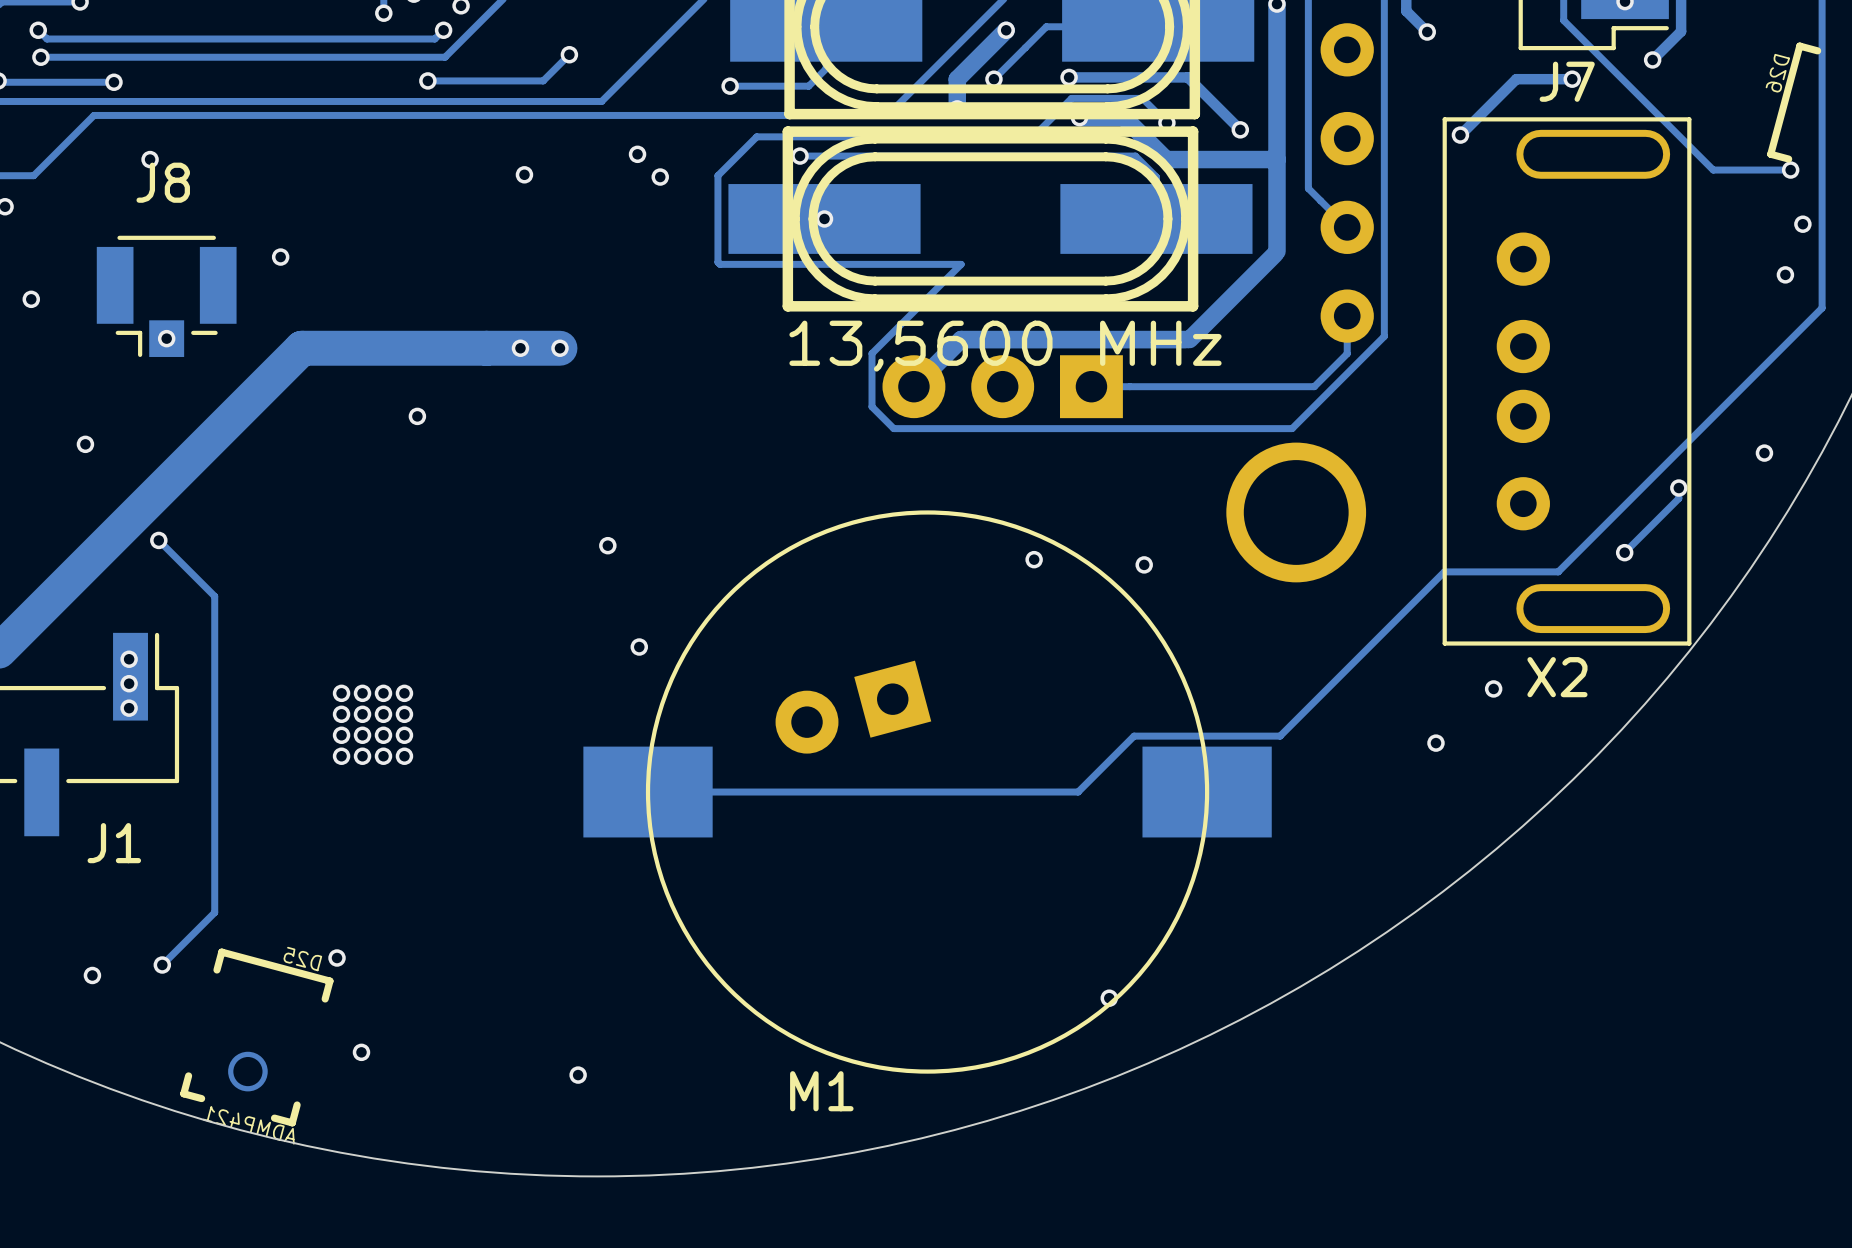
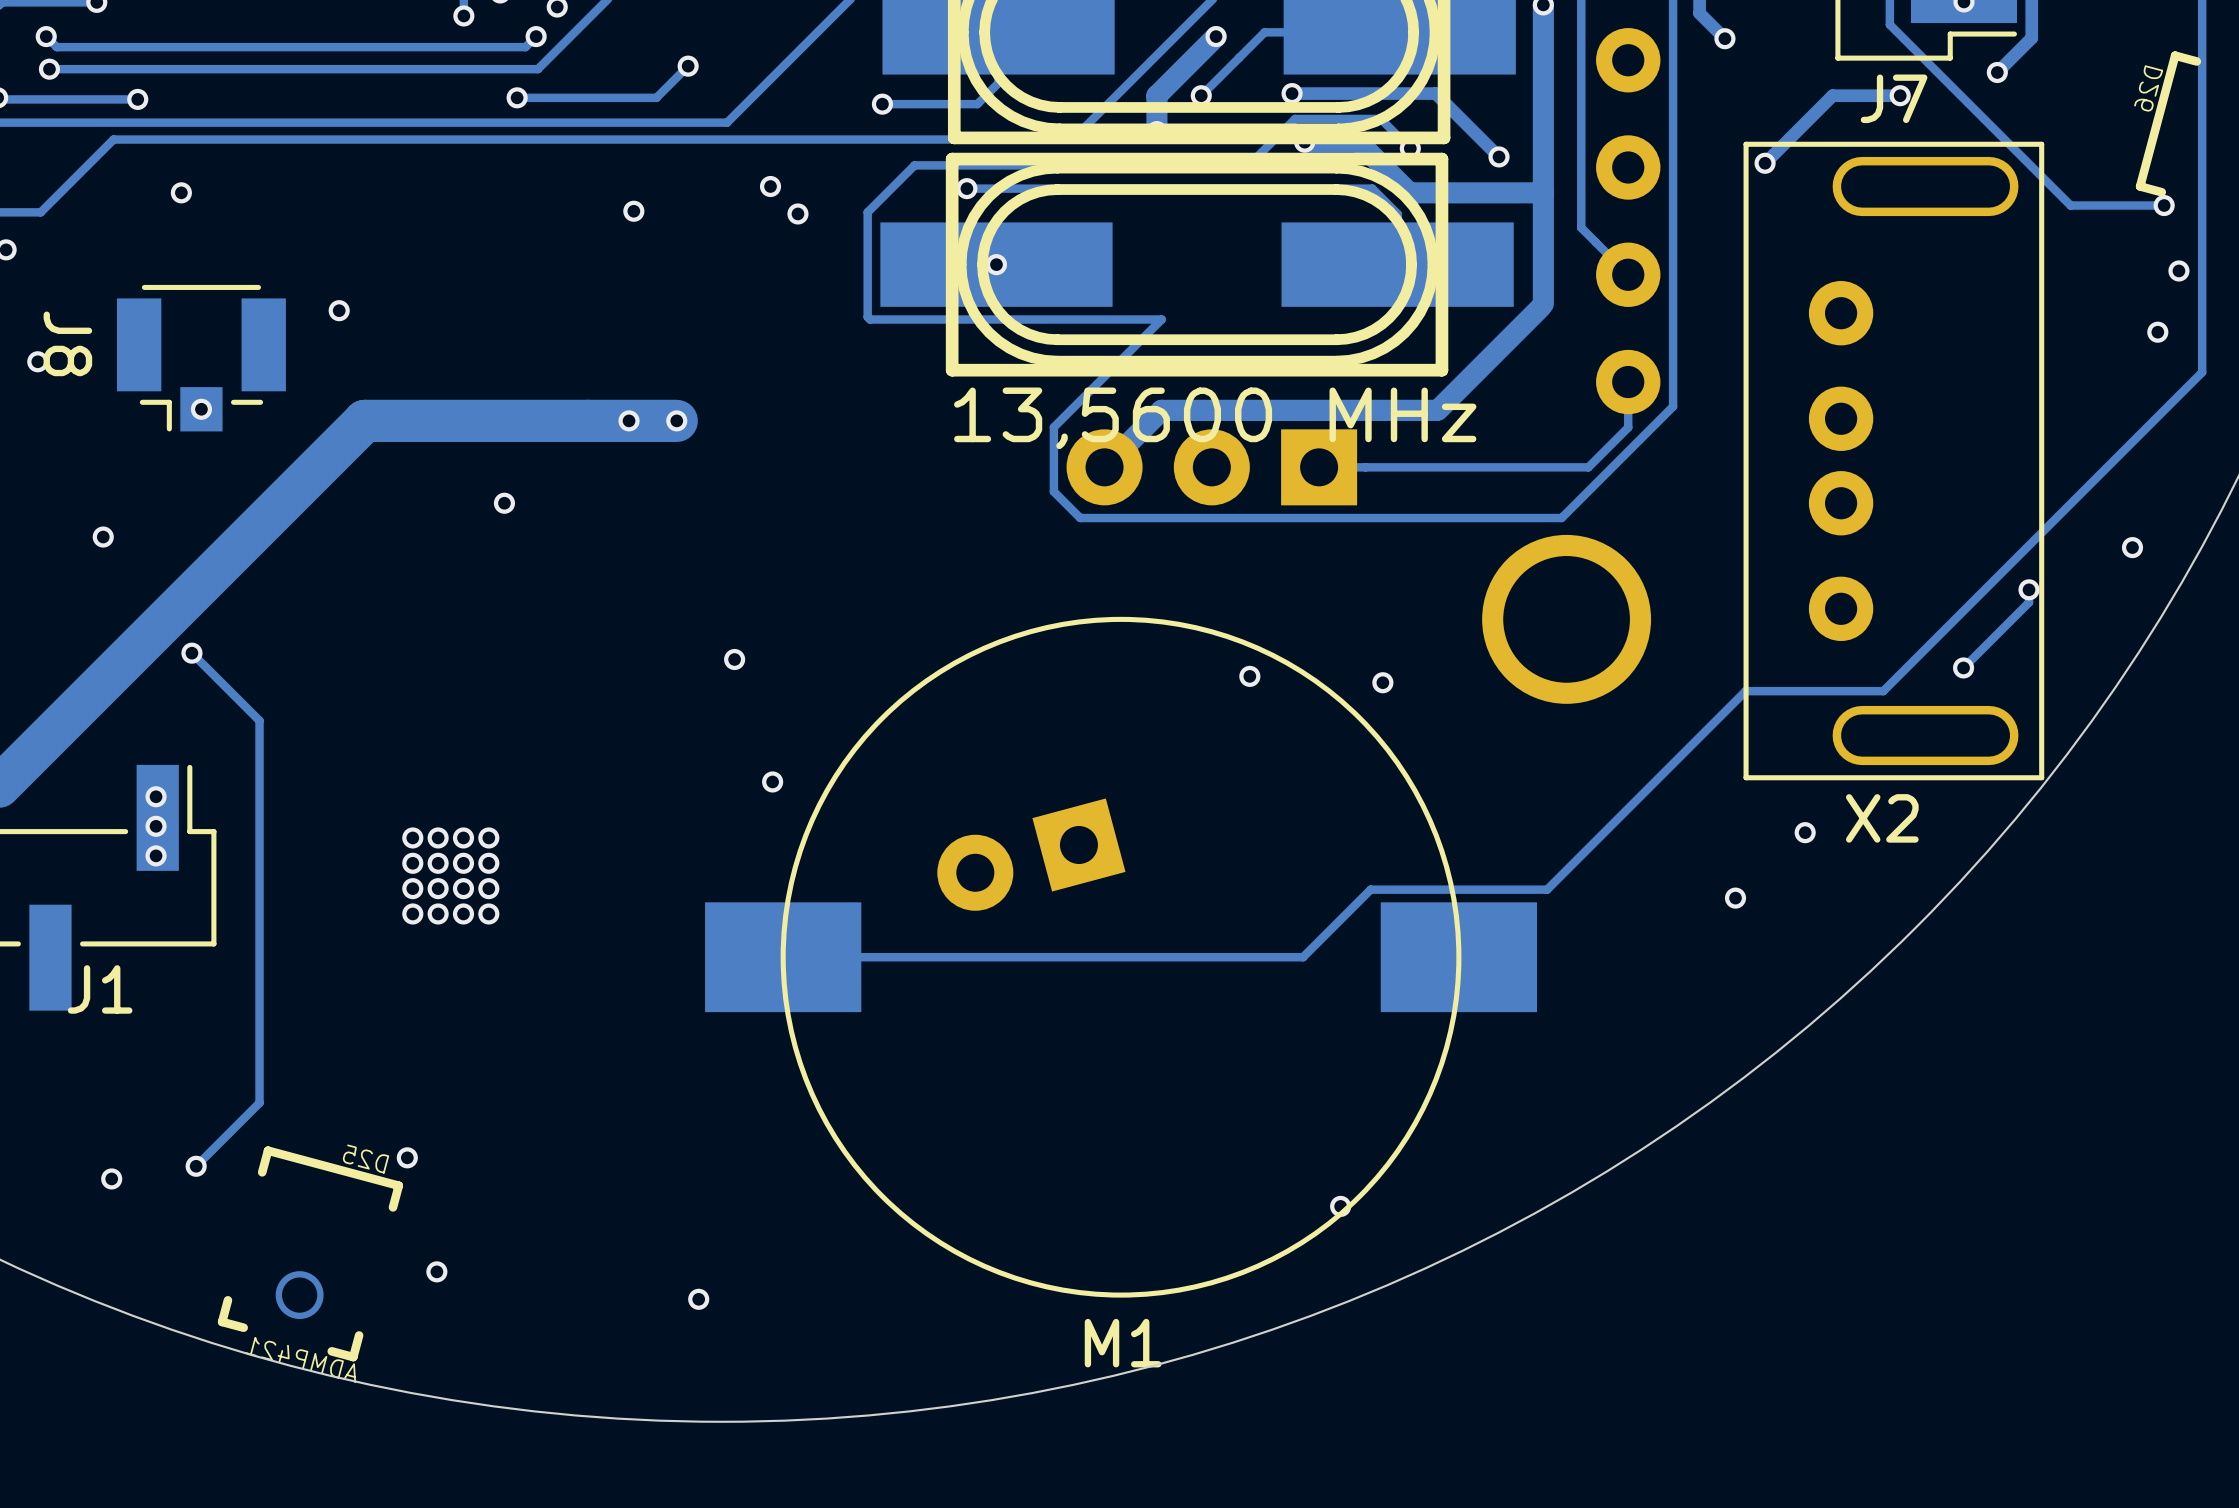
J8 name rotation: 0° (163, 182) -> 90° clockwise (67, 343)
J8 name position: J8 (163, 182) -> J8 (67, 343)
J1 name position: J1 (114, 843) -> J1 (100, 989)
M1 name position: M1 (821, 1091) -> M1 (1123, 1343)

